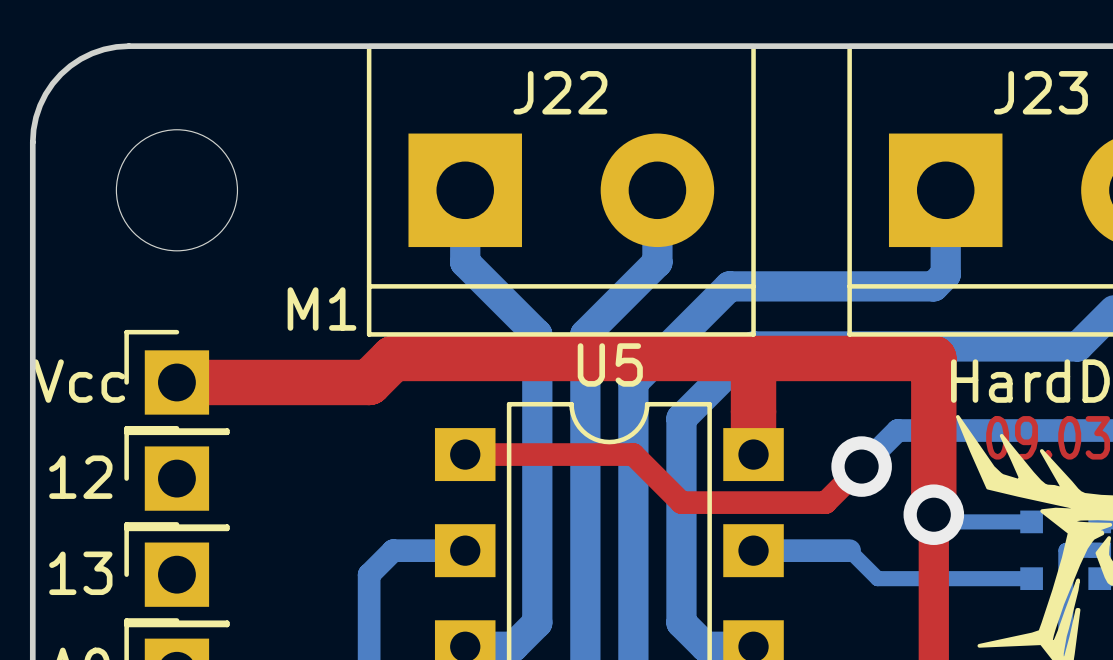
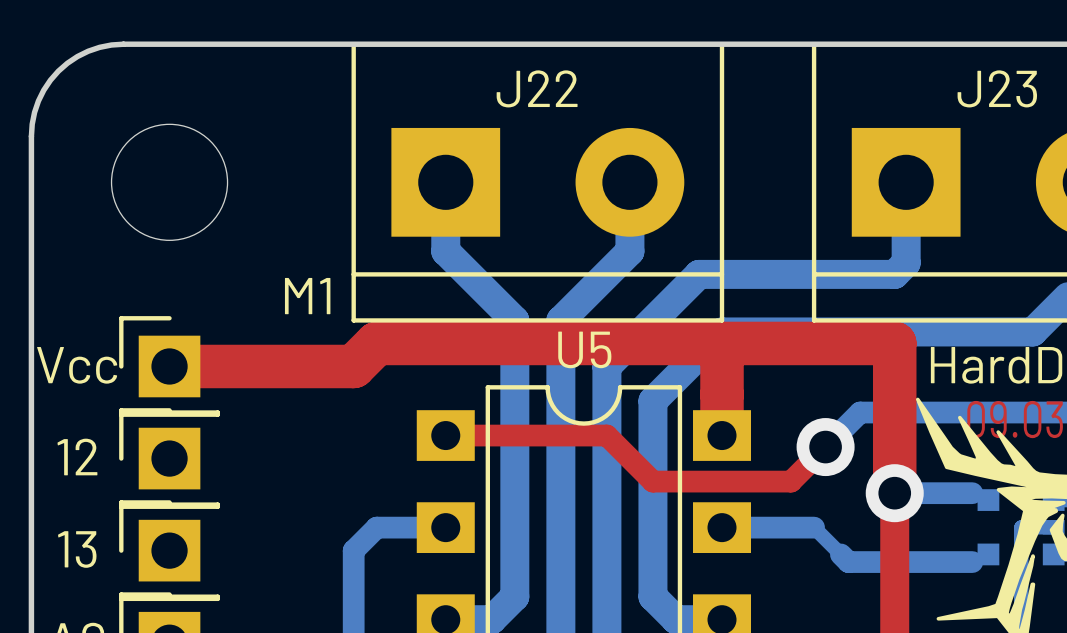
bottom track: (933, 514) (940, 521) (1031, 521) -> (894, 493) (972, 493)
bottom track: (877, 578) (1031, 578) -> (840, 554) (848, 562) (972, 562)

